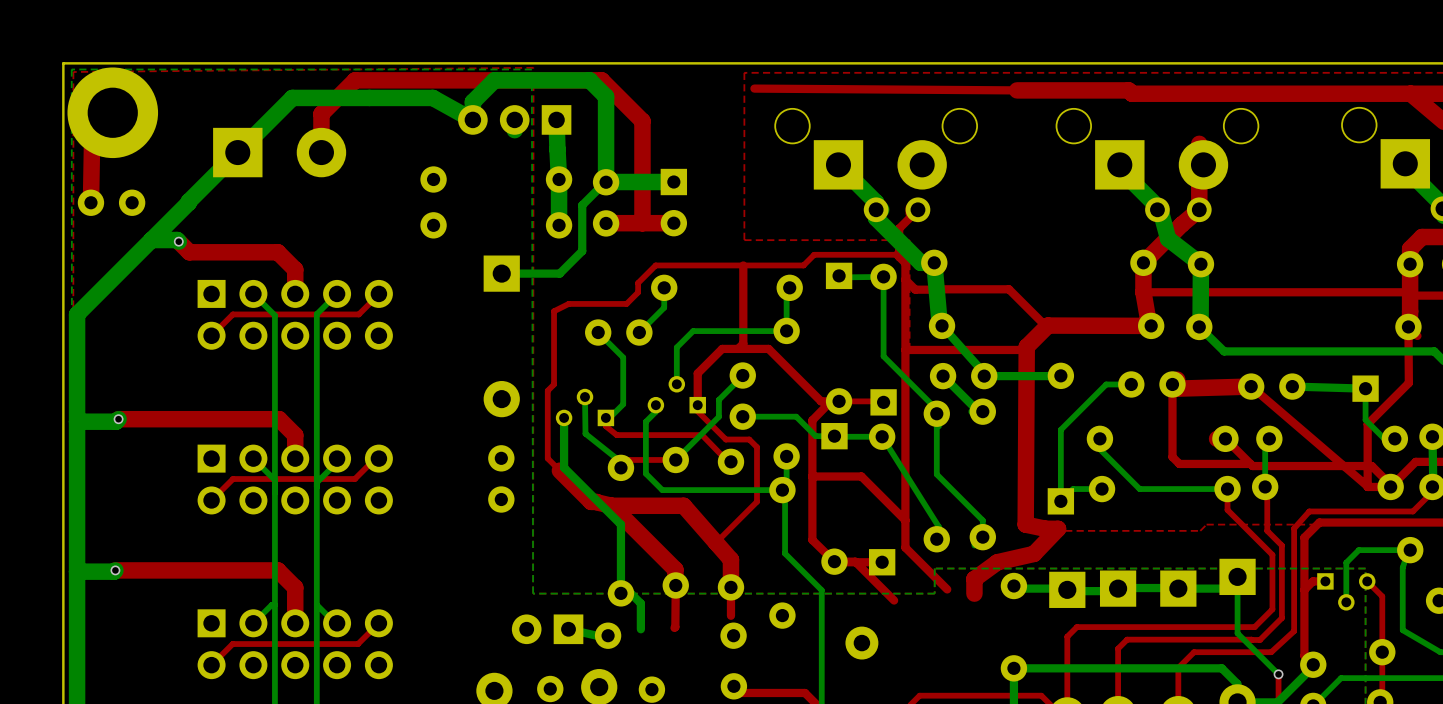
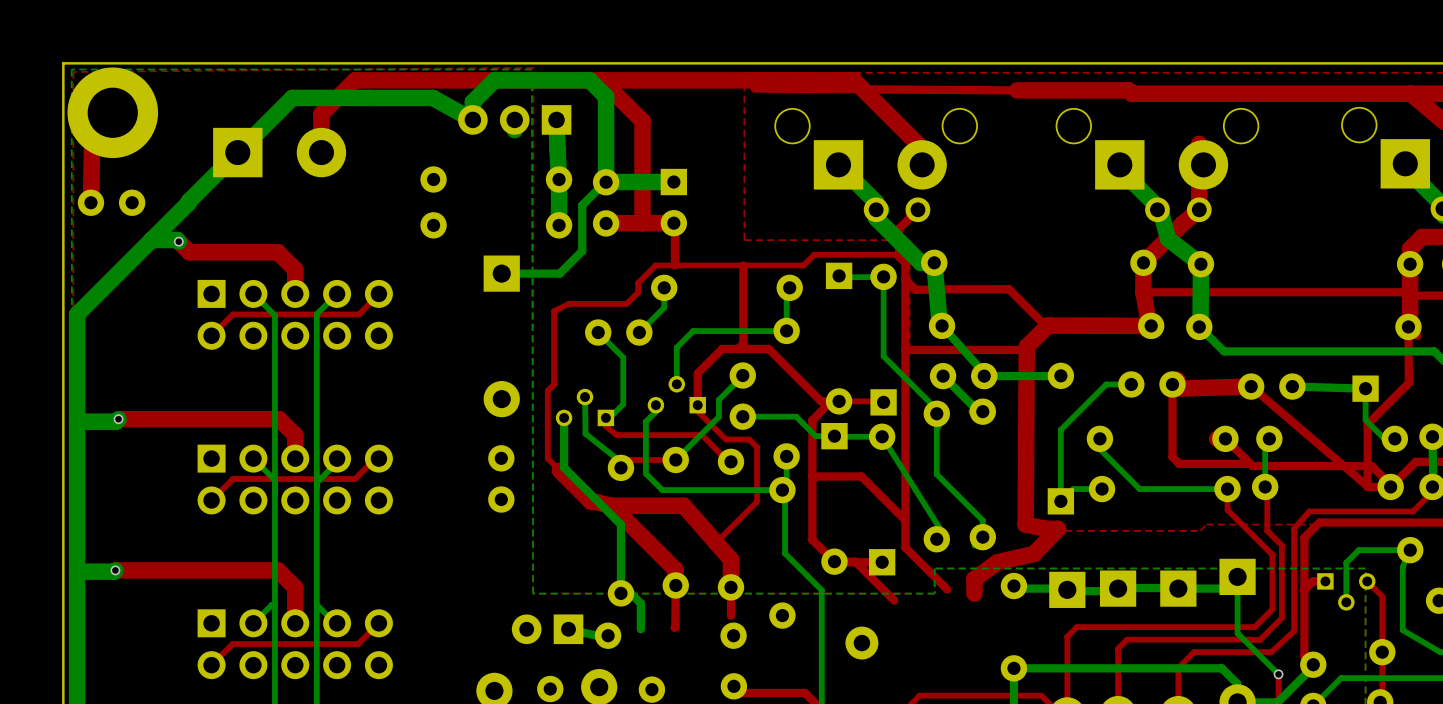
top track: none -> (601, 80) (853, 80) (922, 148) (922, 164)
top track: none -> (673, 223) (674, 265)

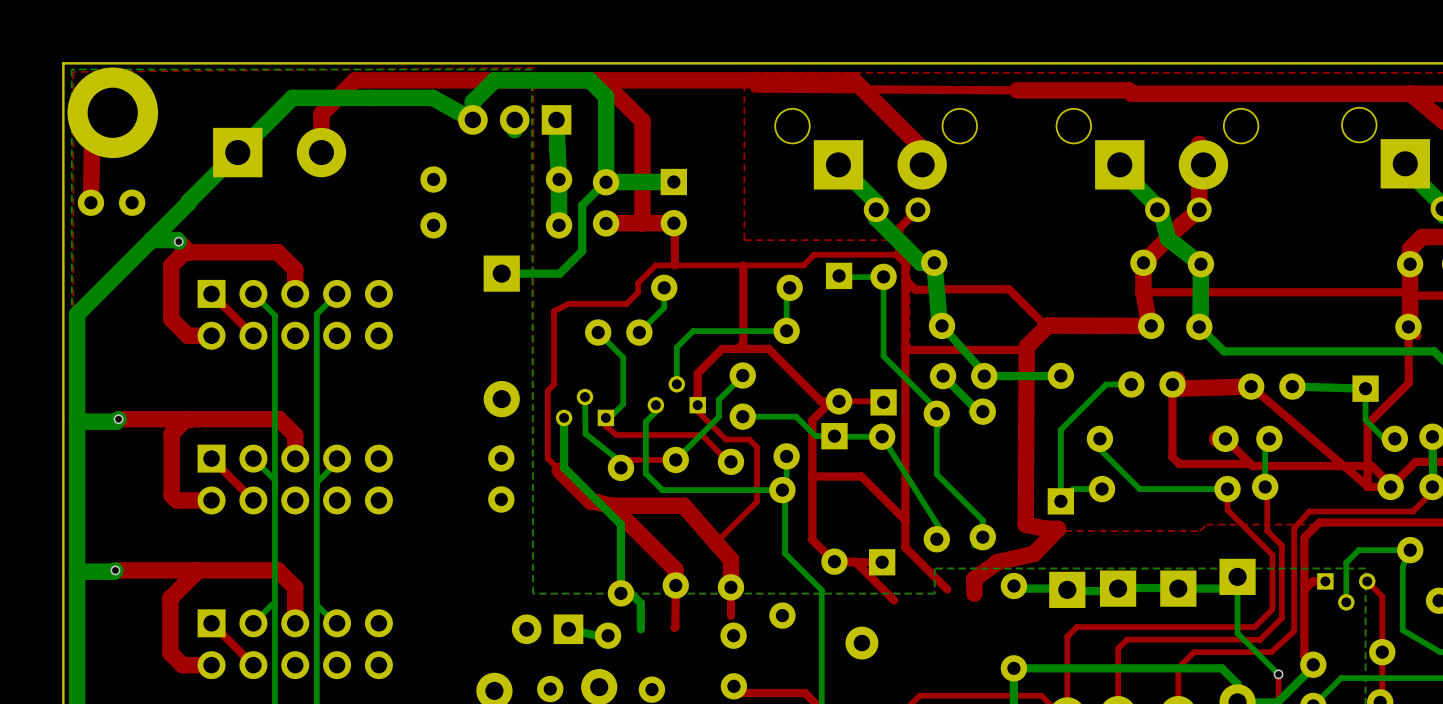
top track: none -> (211, 293) (253, 335)
top track: (378, 294) (358, 314) (232, 314) (211, 335) -> (189, 252) (184, 252) (171, 265) (171, 319) (187, 335) (211, 335)
top track: none -> (211, 458) (253, 500)
top track: (375, 458) (354, 479) (233, 479) (211, 500) -> (186, 419) (171, 433) (171, 495) (176, 500) (211, 500)
top track: none -> (211, 623) (253, 665)
top track: (378, 623) (358, 644) (232, 644) (211, 665) -> (195, 570) (195, 573) (170, 598) (170, 653) (182, 665) (211, 665)

